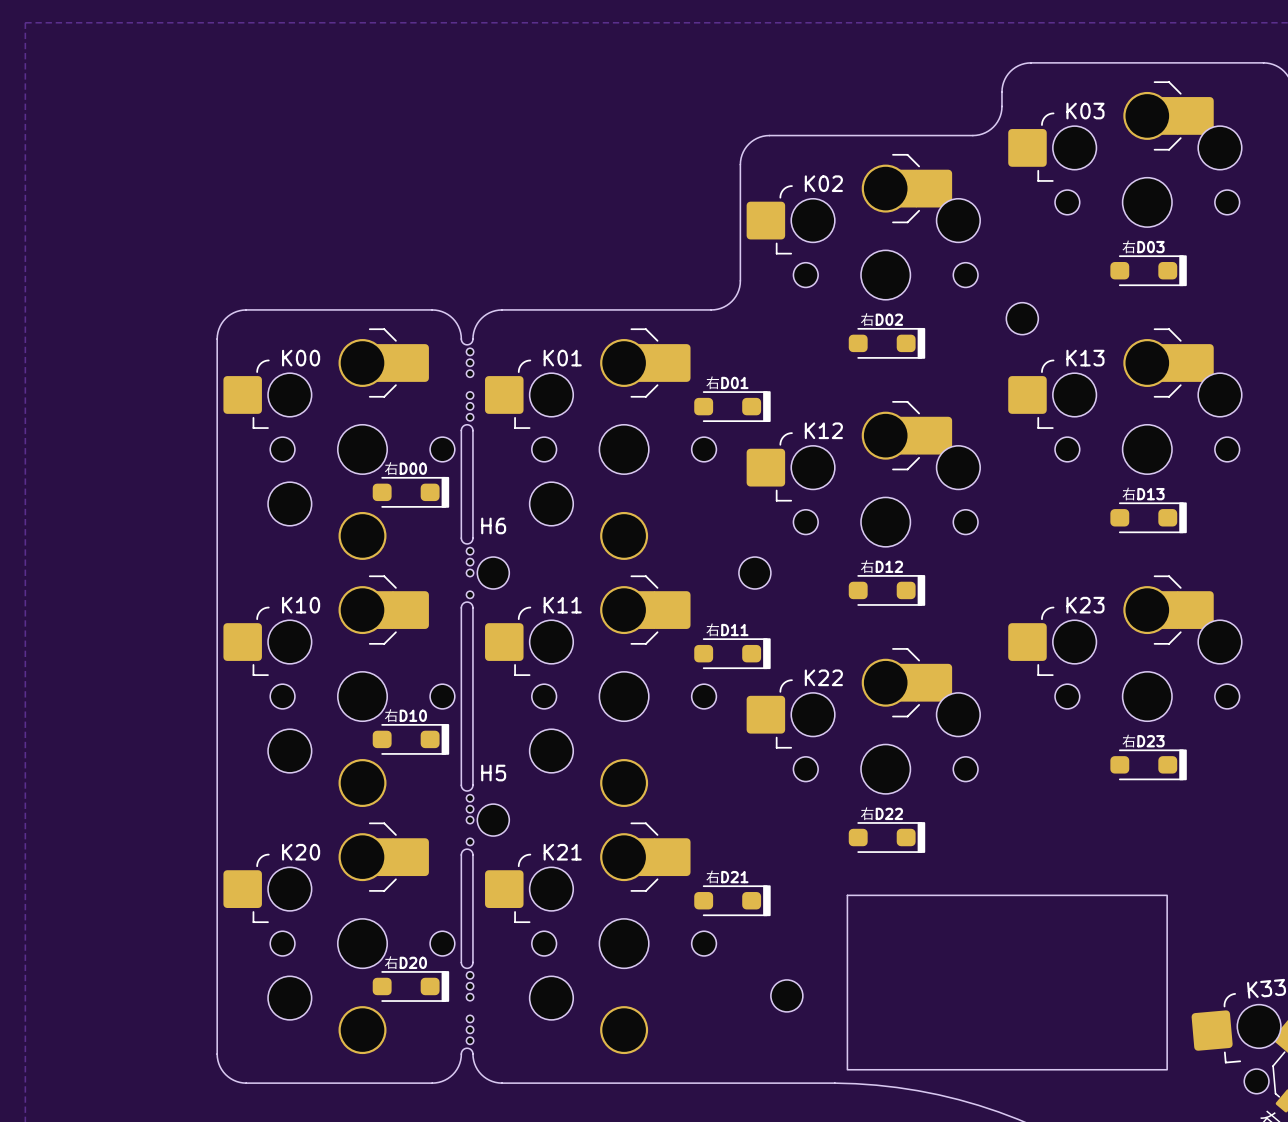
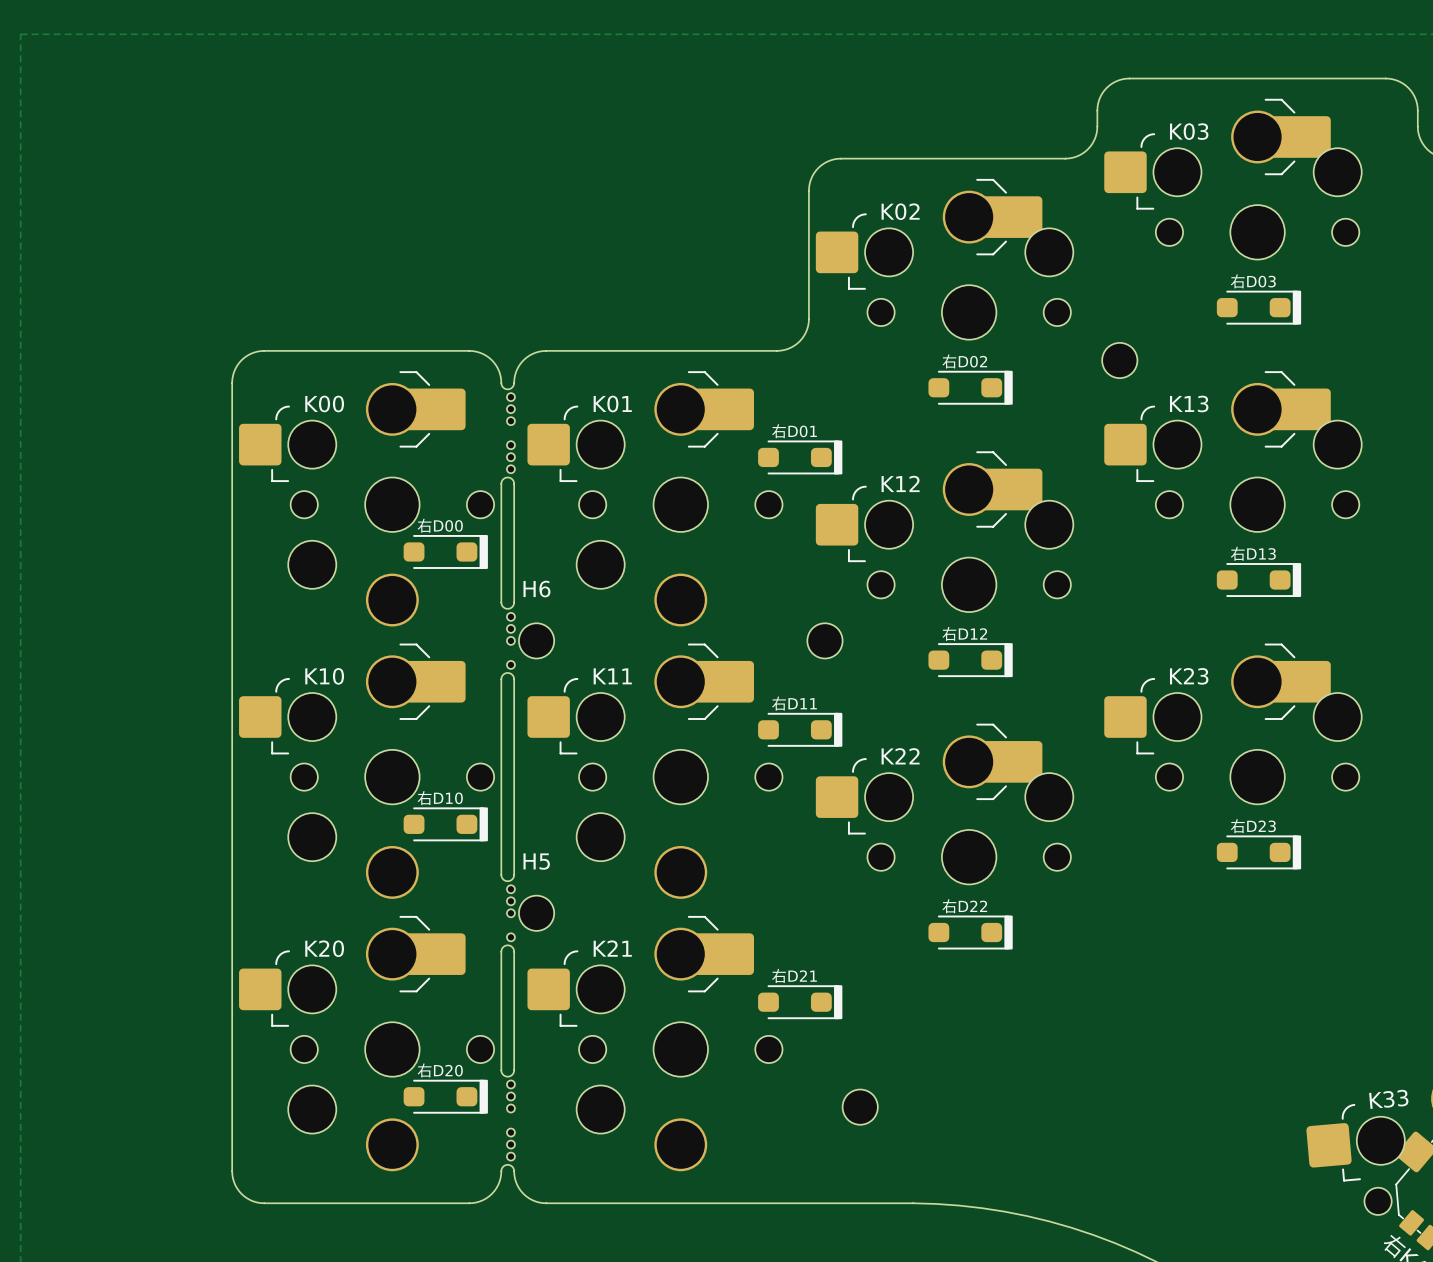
drawing: [847, 894, 1168, 1071] -> none

